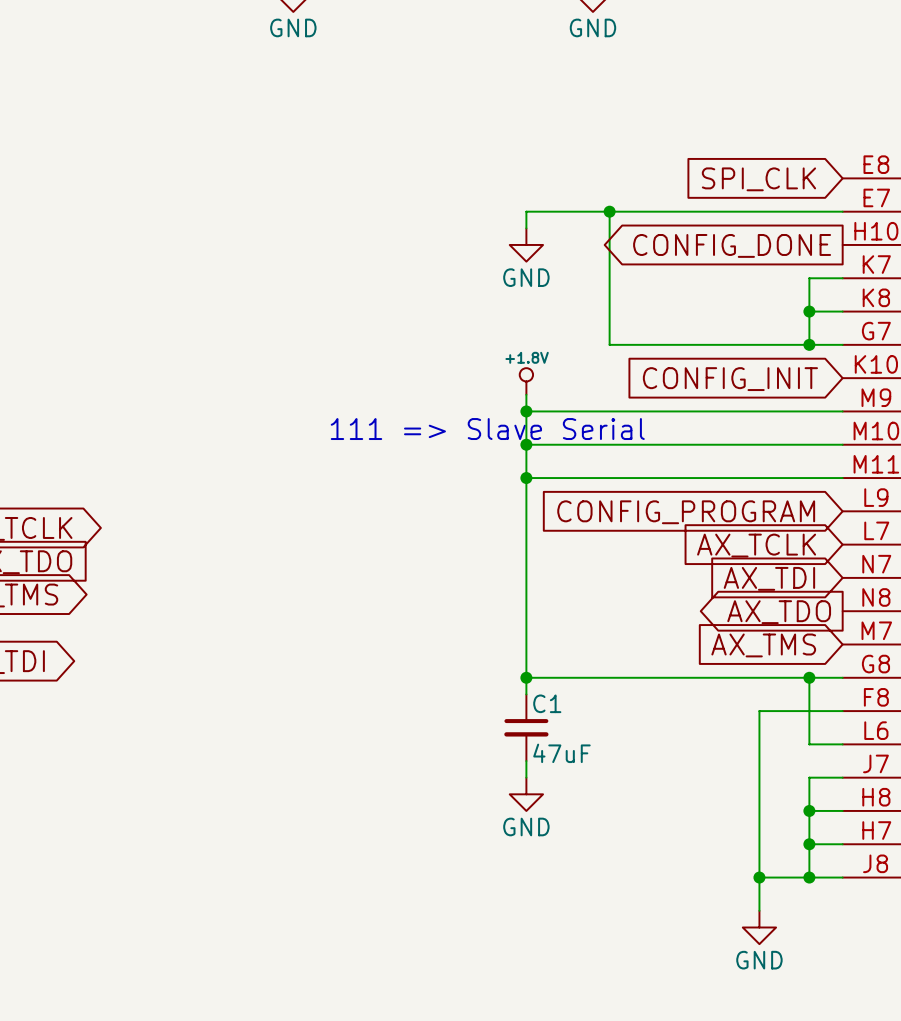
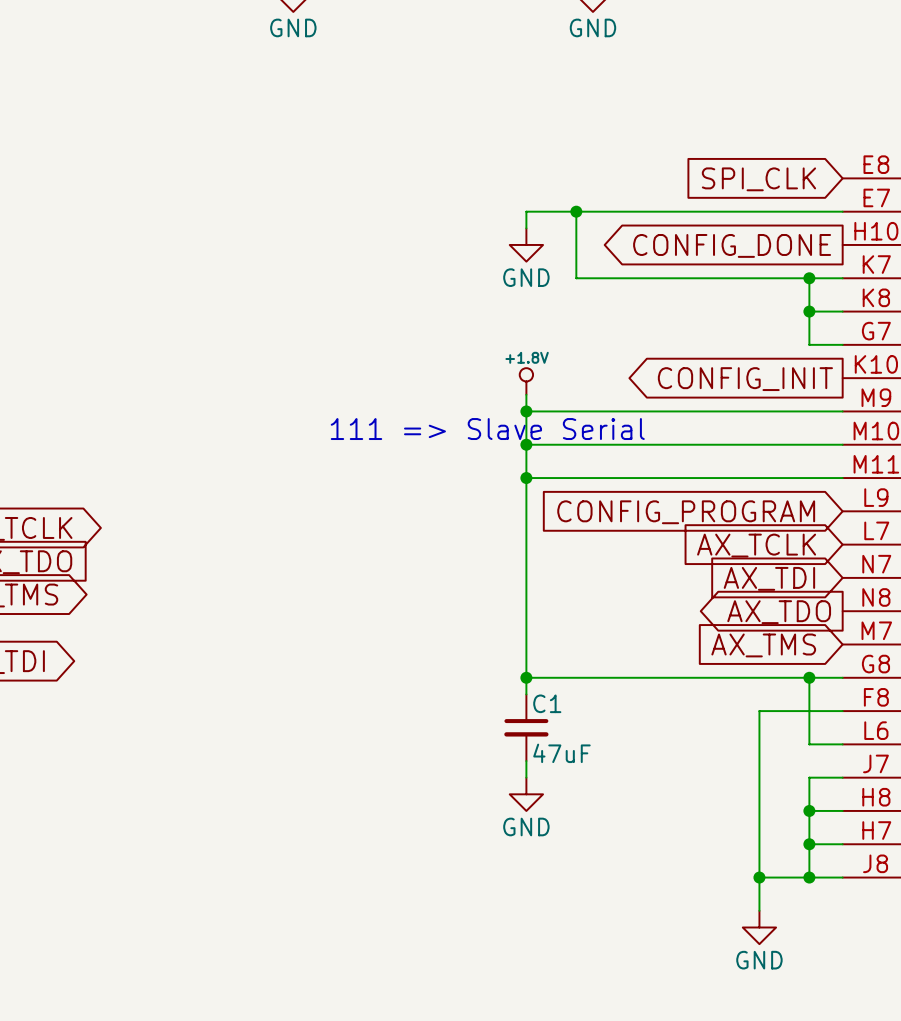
wire: none -> (576, 211) (576, 278) (809, 278)
wire: (609, 211) (609, 344) (809, 344) -> none
junction position: (609, 211) -> (576, 211)
junction position: (809, 344) -> (809, 278)
global label shape: input (730, 379) -> output (745, 379)

